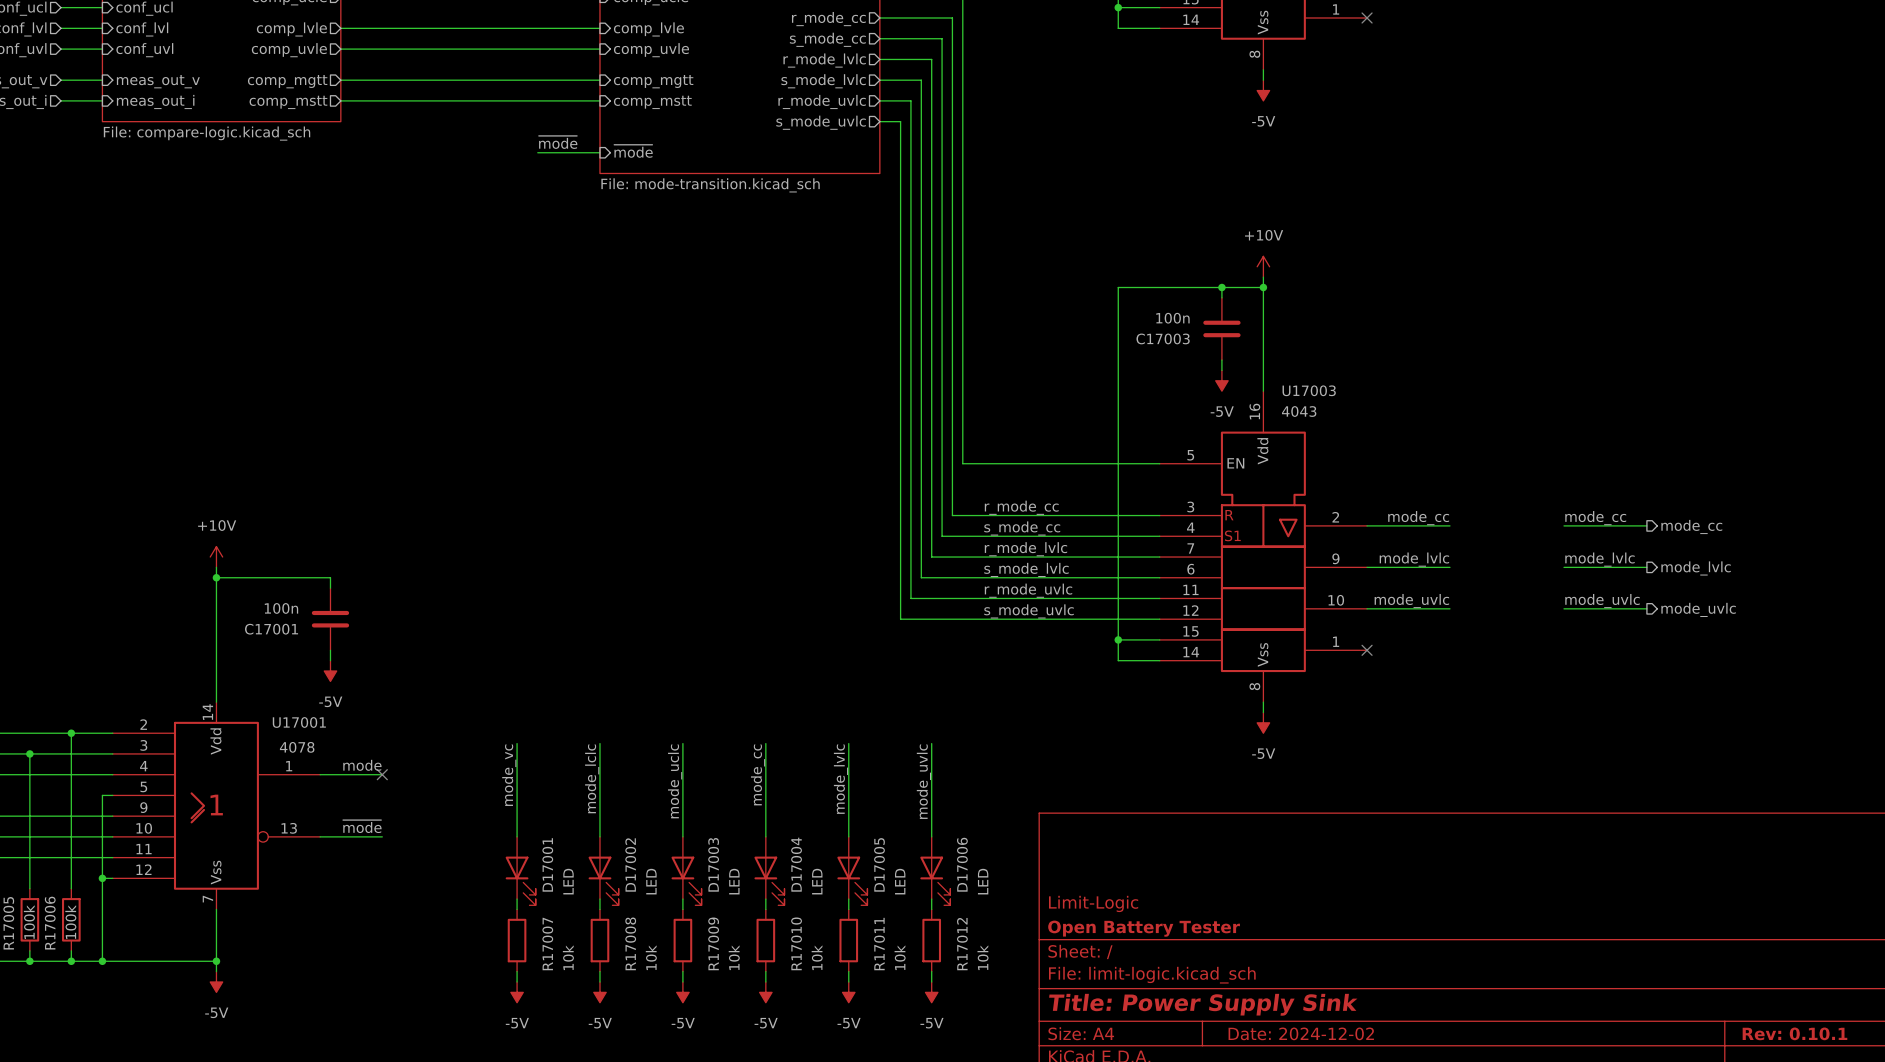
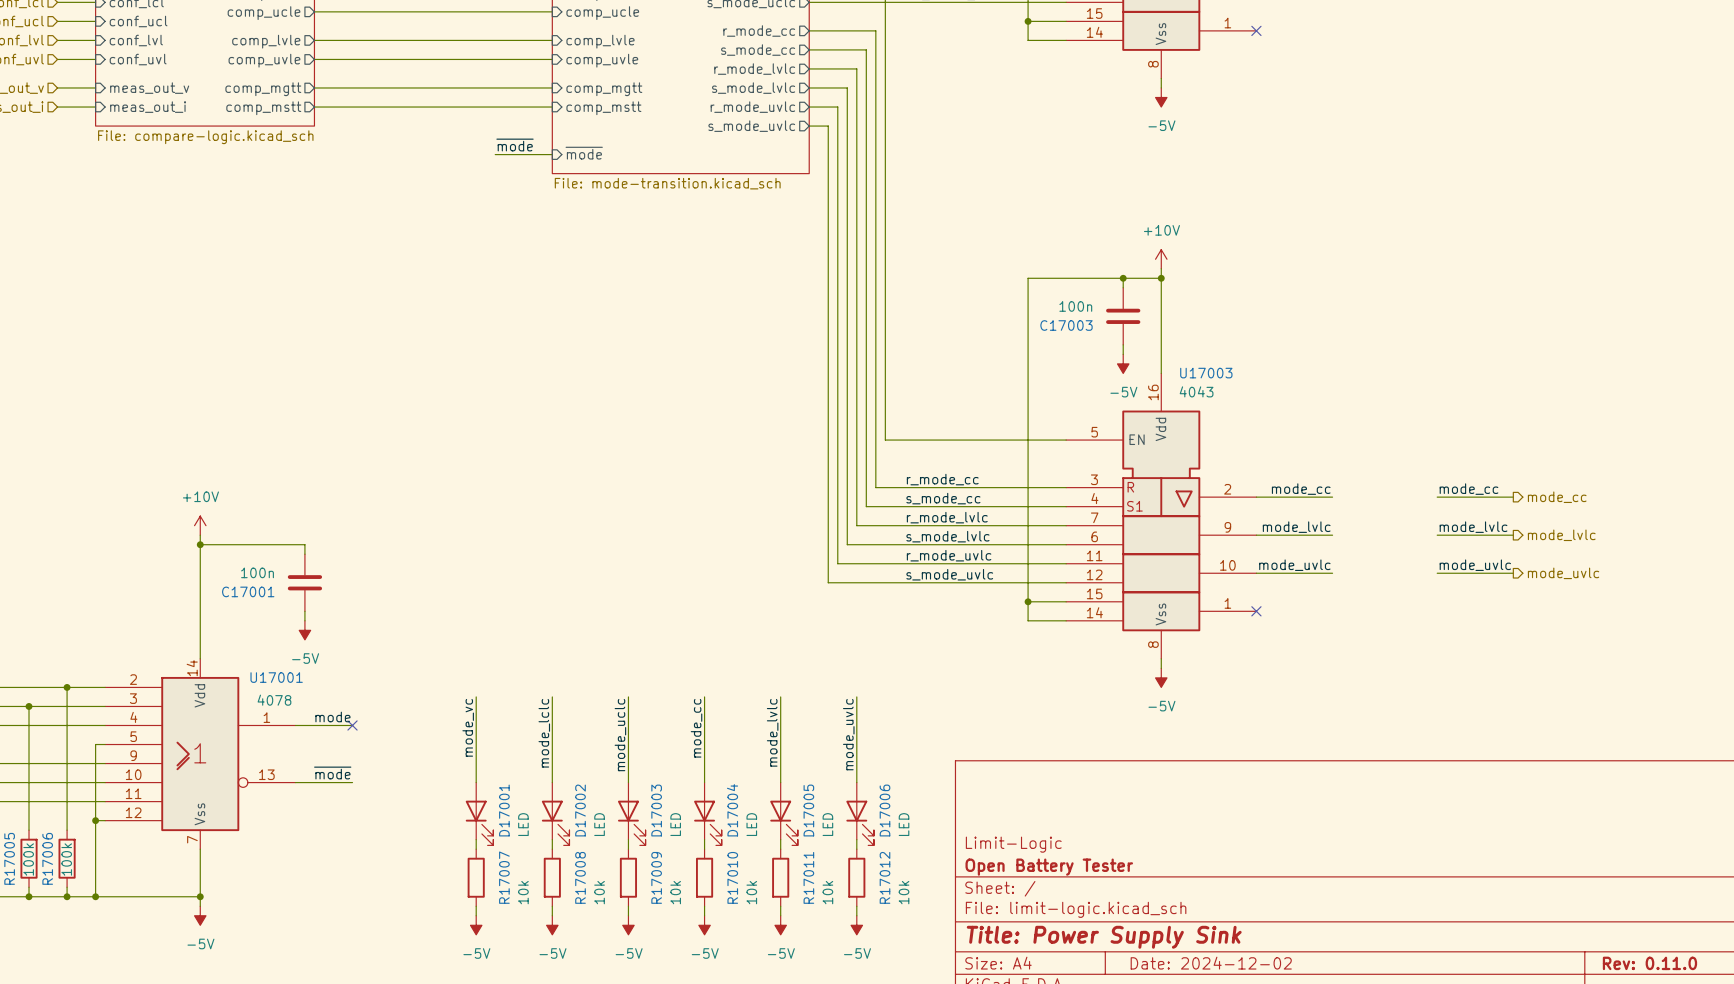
title block: Rev: 0.10.1 (1794, 1033) -> Rev: 0.11.0 (1649, 963)

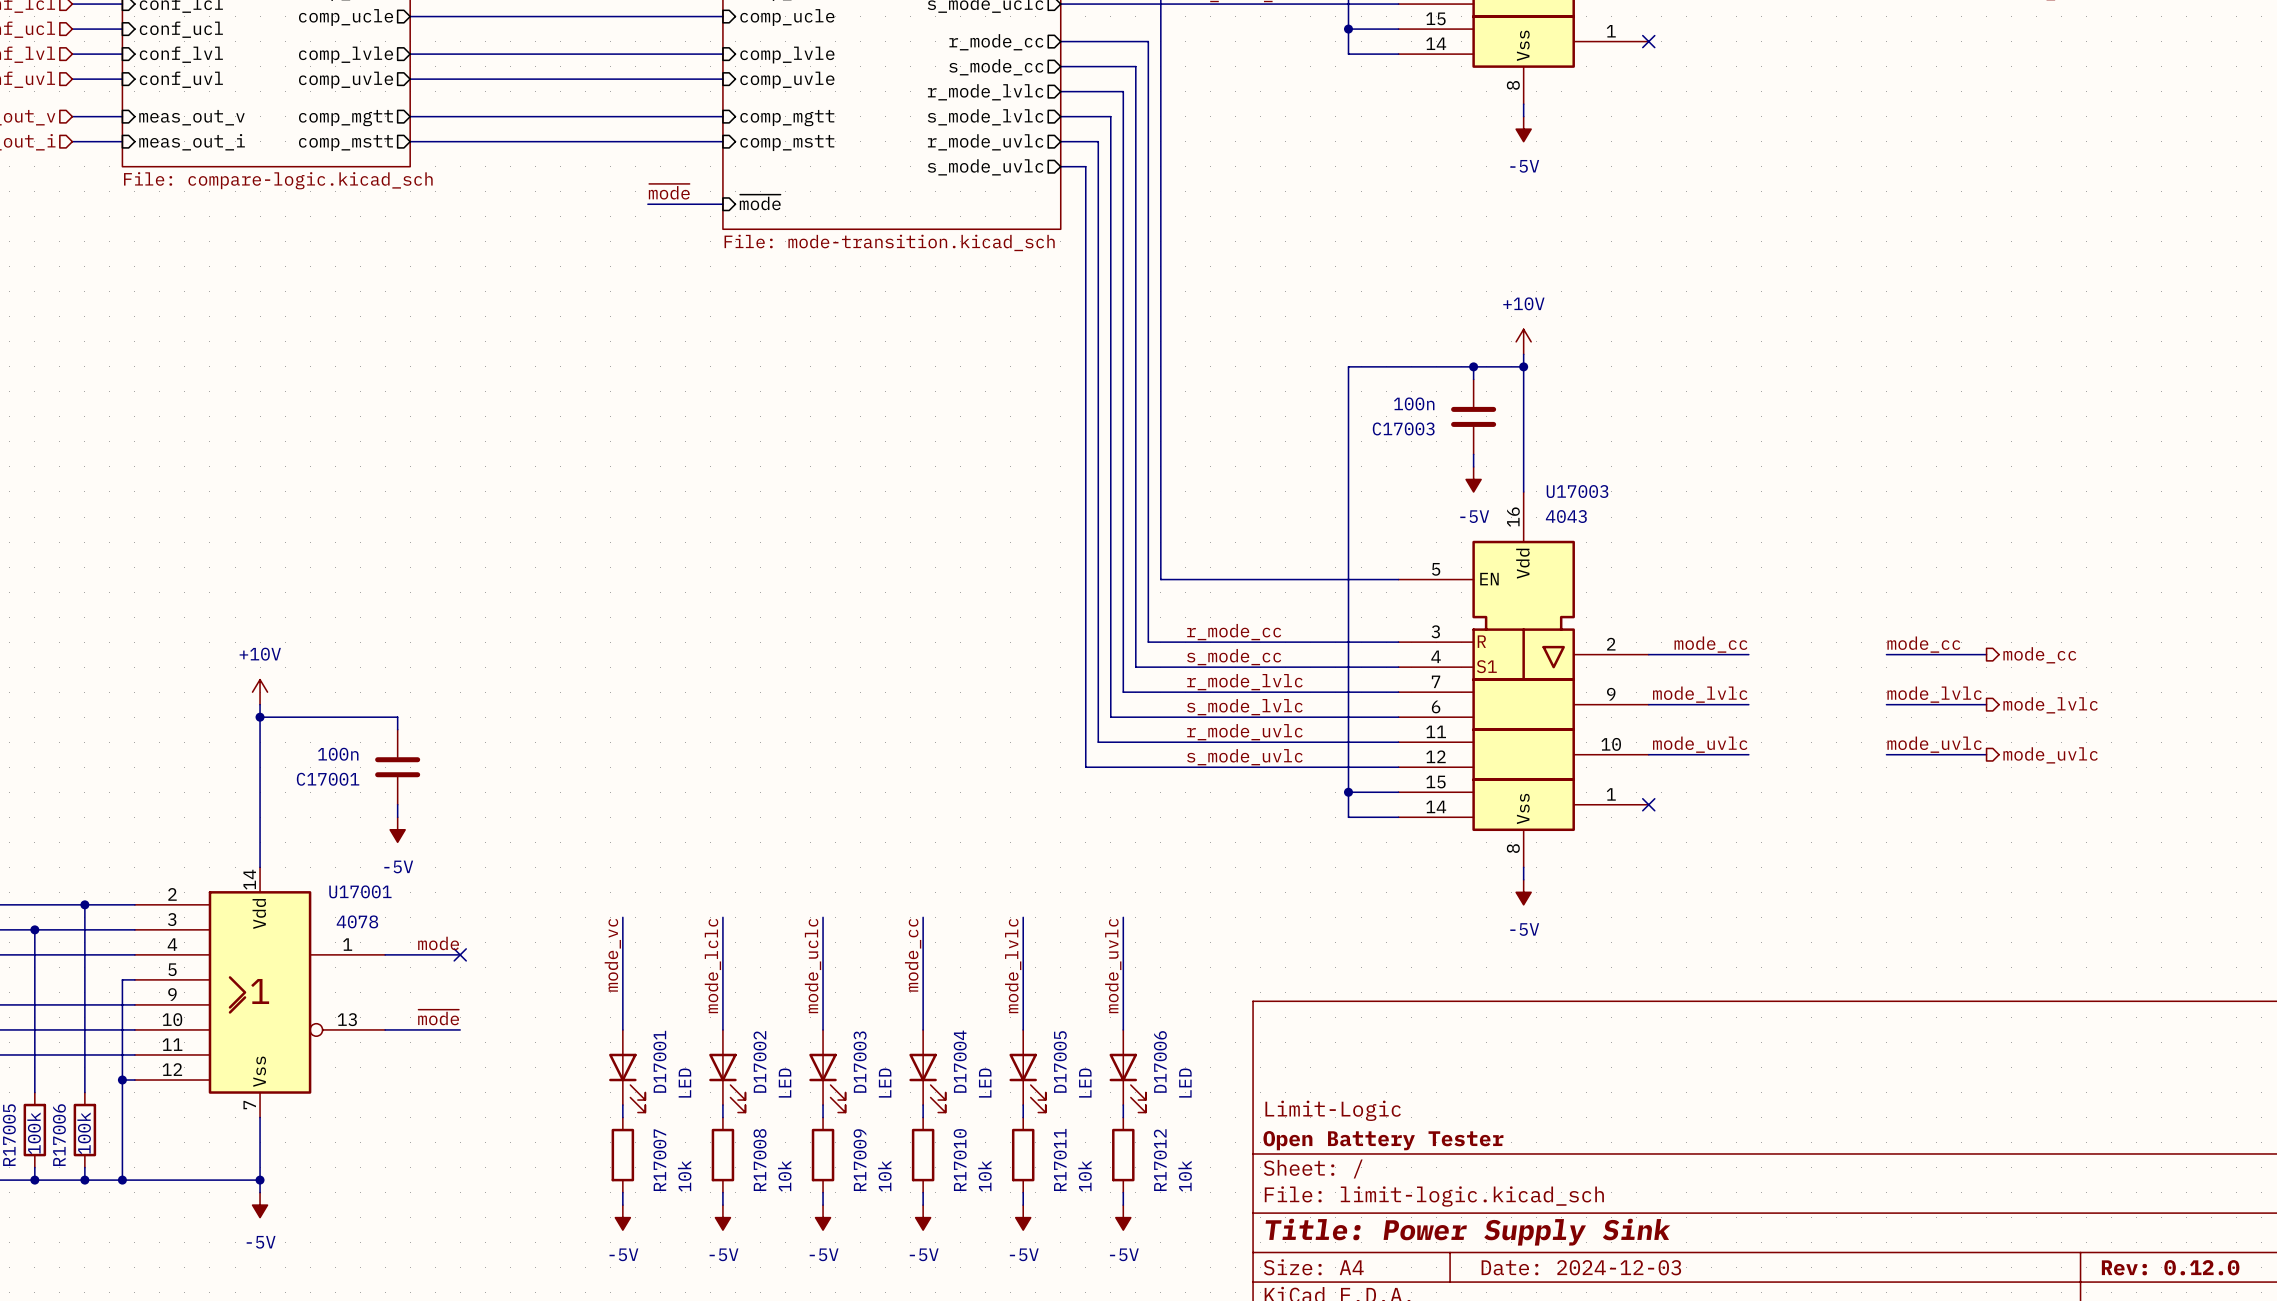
title block: Date: 2024-12-02 (1211, 963) -> Date: 2024-12-03 (1581, 1267)
title block: Rev: 0.11.0 (1649, 963) -> Rev: 0.12.0 (2170, 1267)

